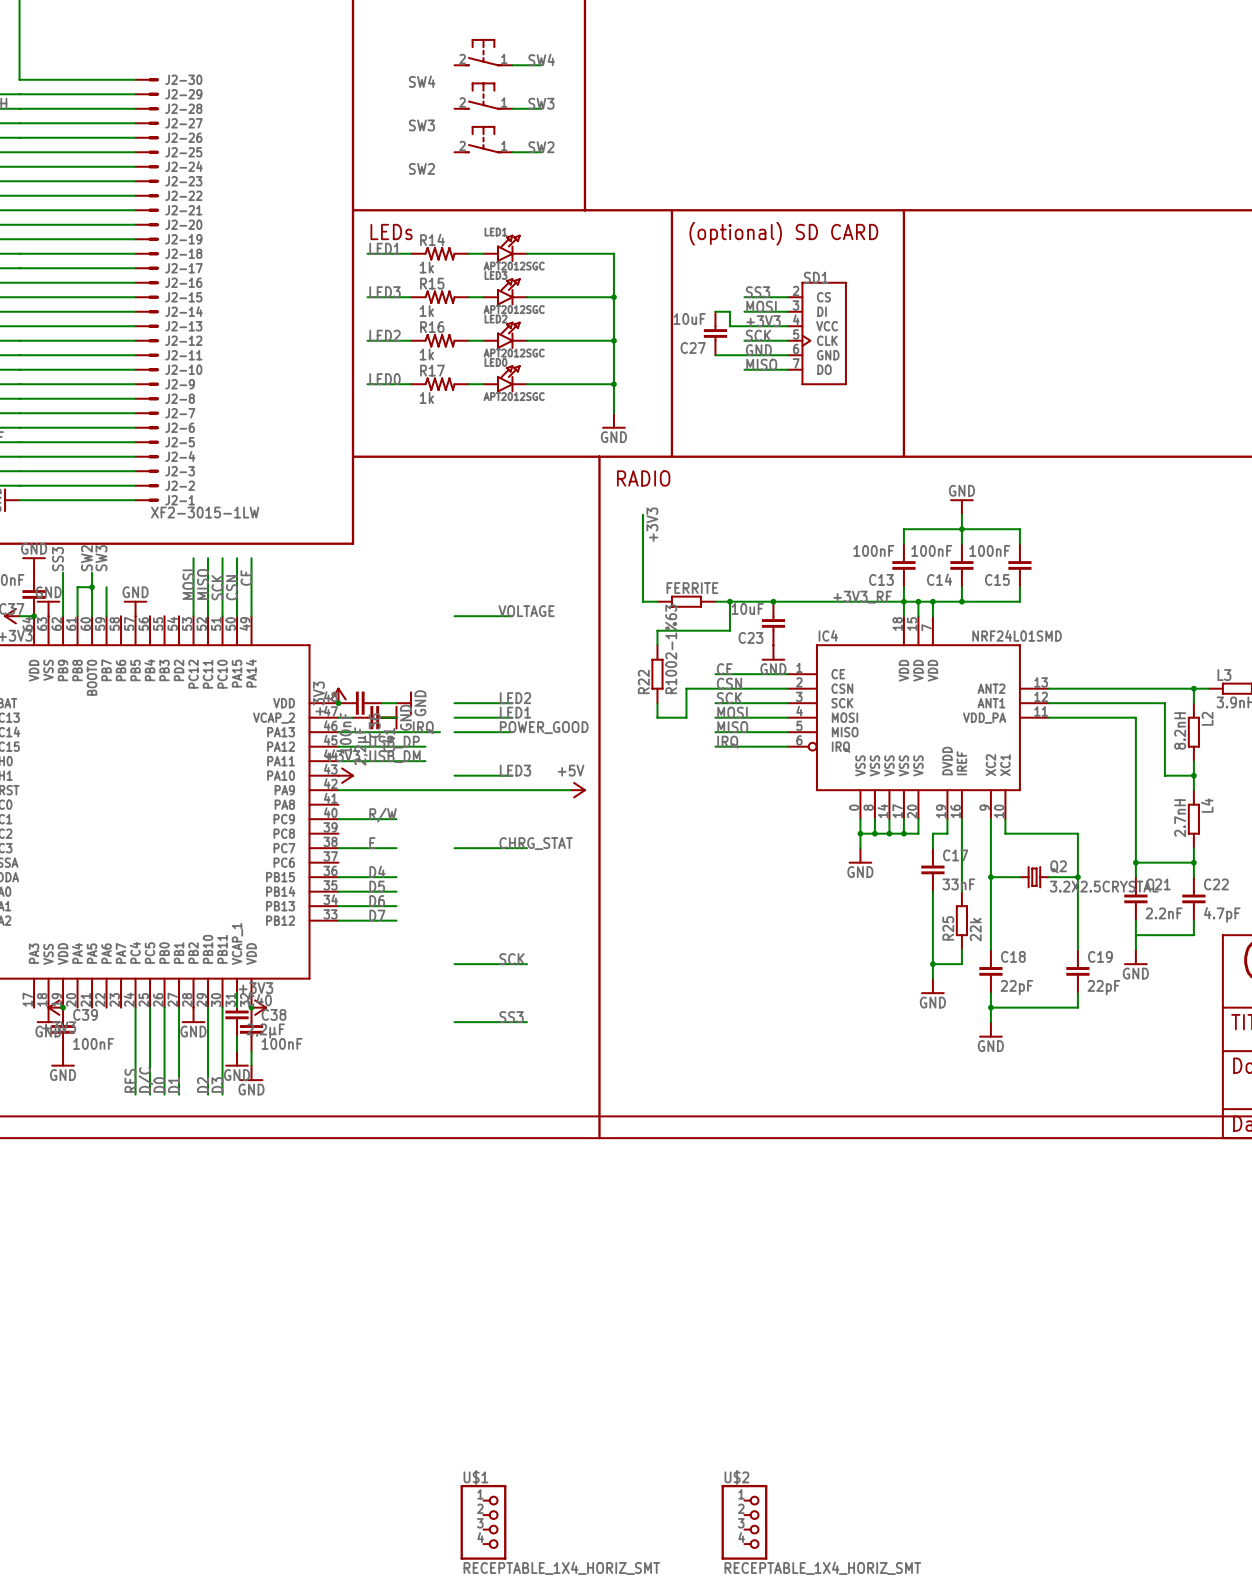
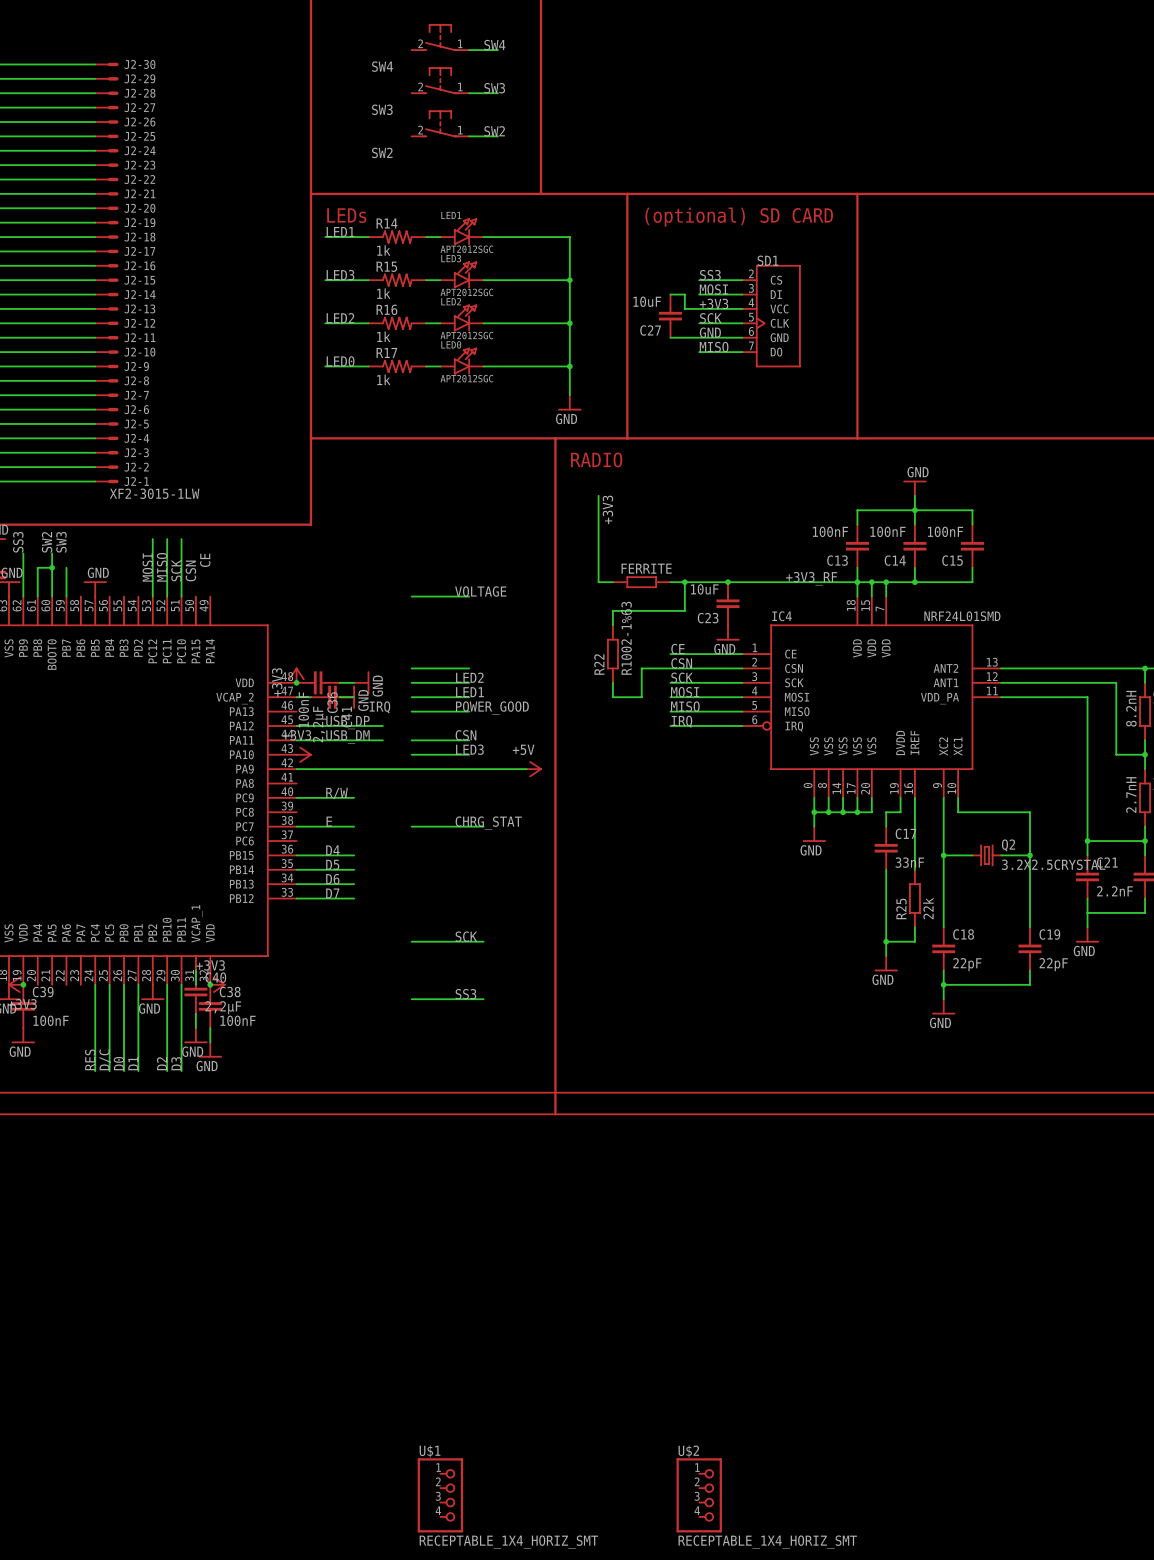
wire: (237, 558) (237, 616) -> none
wire: (251, 558) (251, 616) -> none
wire: none -> (411, 668) (469, 668)
wire: (338, 732) (439, 732) -> none
label: none -> CSN (465, 735)
wire: none -> (411, 740) (469, 740)

